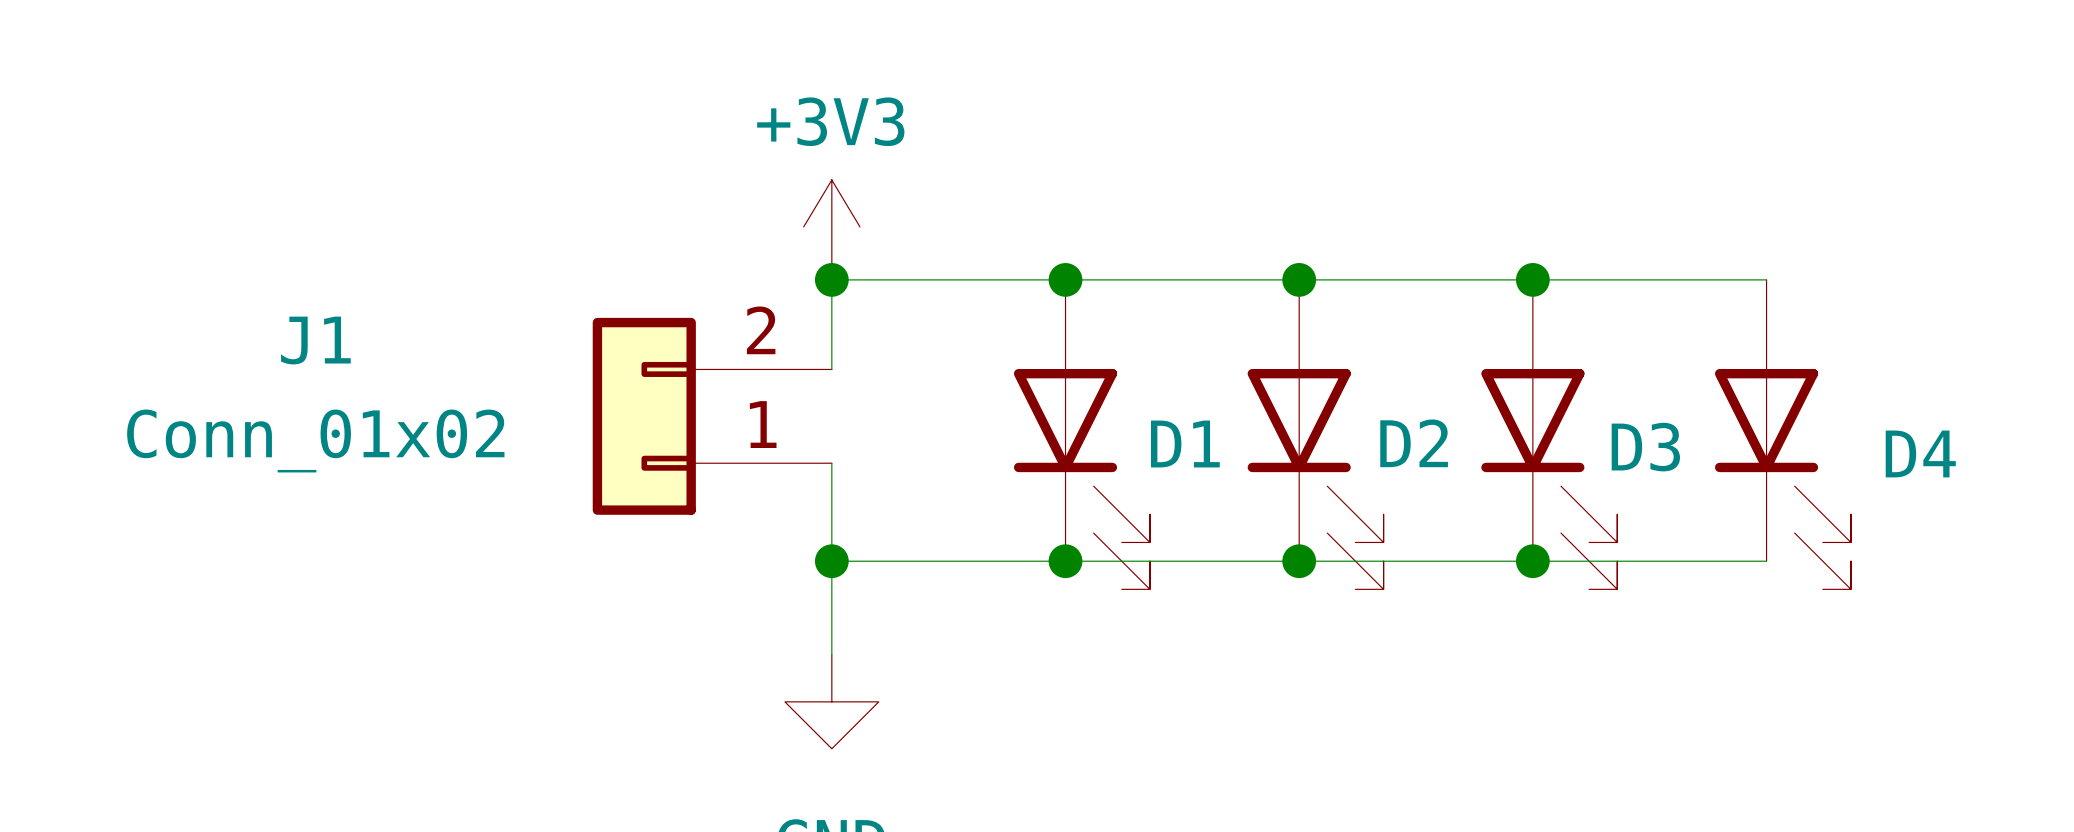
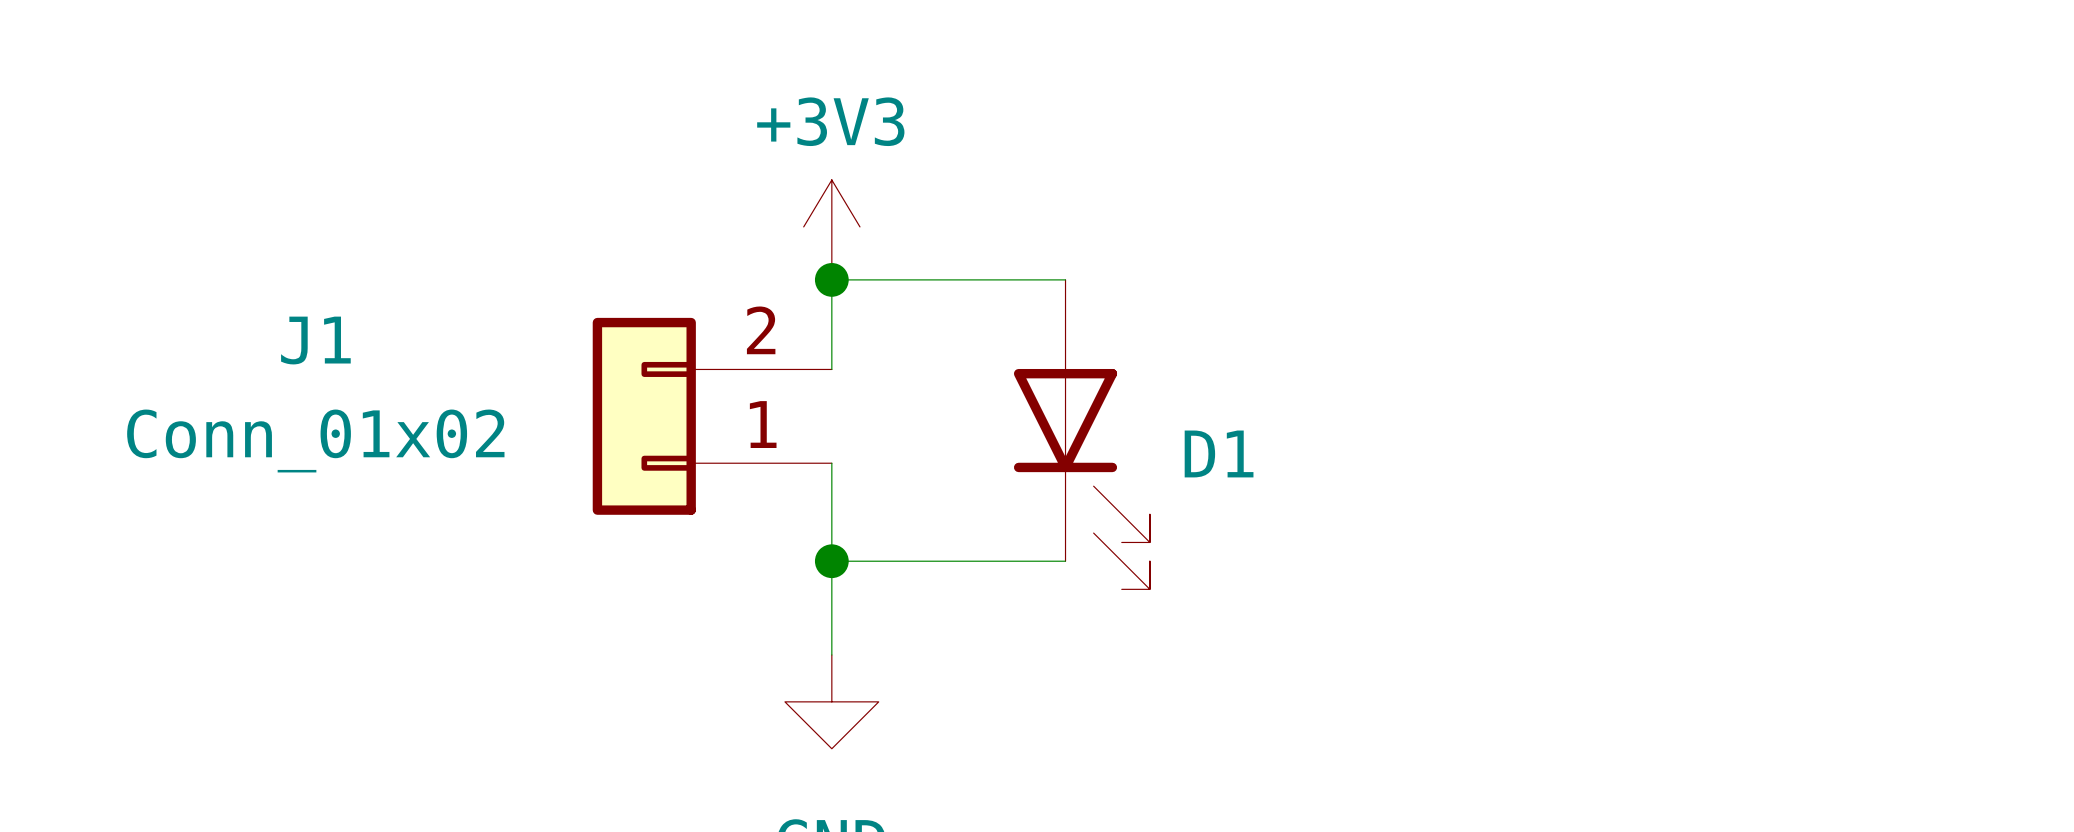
wire: (1065, 279) (1766, 279) -> none
junction: (1065, 279) -> none
junction: (1299, 279) -> none
junction: (1532, 279) -> none
D2: (1315, 434) -> none
D3: (1549, 434) -> none
D4: (1782, 434) -> none
D1 name position: D1 (1185, 444) -> D1 (1219, 453)
wire: (1065, 561) (1766, 561) -> none
junction: (1065, 561) -> none
junction: (1299, 561) -> none
junction: (1532, 561) -> none

